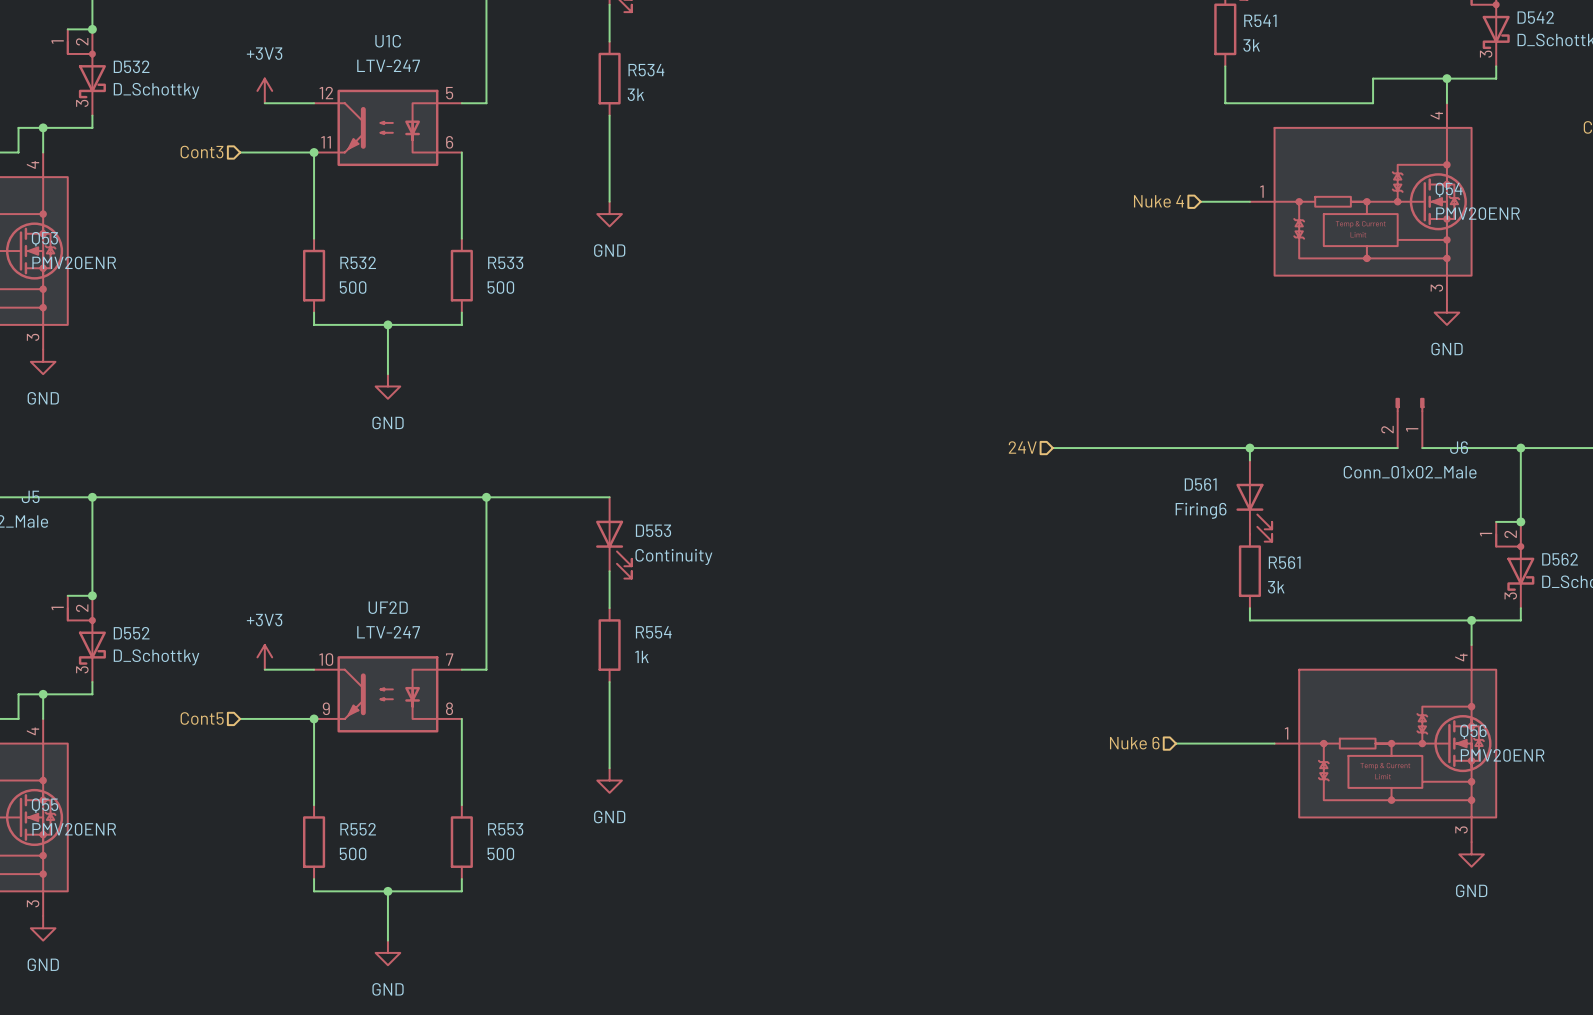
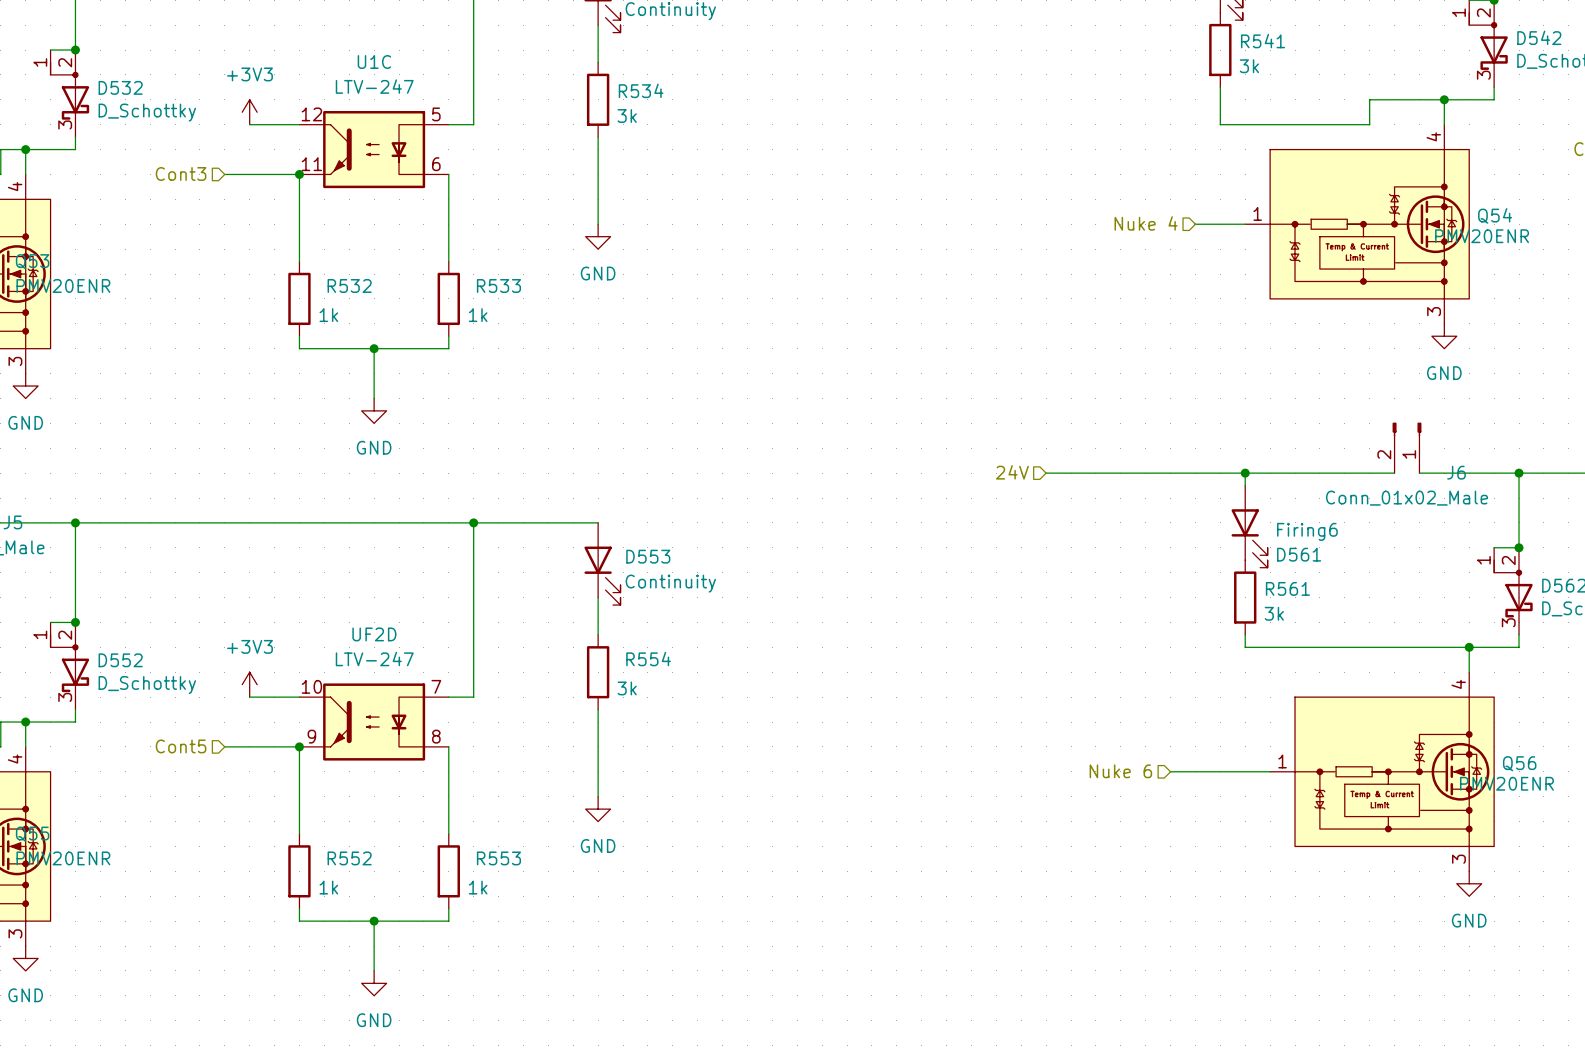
Q54 name position: Q54 (1449, 189) -> Q54 (1495, 215)
R532 value: 500 (353, 287) -> 1k (328, 315)
R533 value: 500 (500, 287) -> 1k (478, 315)
Firing6 value position: D561 (1200, 484) -> D561 (1299, 554)
Firing6 name position: Firing6 (1201, 510) -> Firing6 (1307, 531)
R554 value: 1k (641, 656) -> 3k (627, 688)
Q56 name position: Q56 (1473, 731) -> Q56 (1519, 763)
R552 value: 500 (353, 853) -> 1k (328, 887)
R553 value: 500 (500, 853) -> 1k (478, 887)

